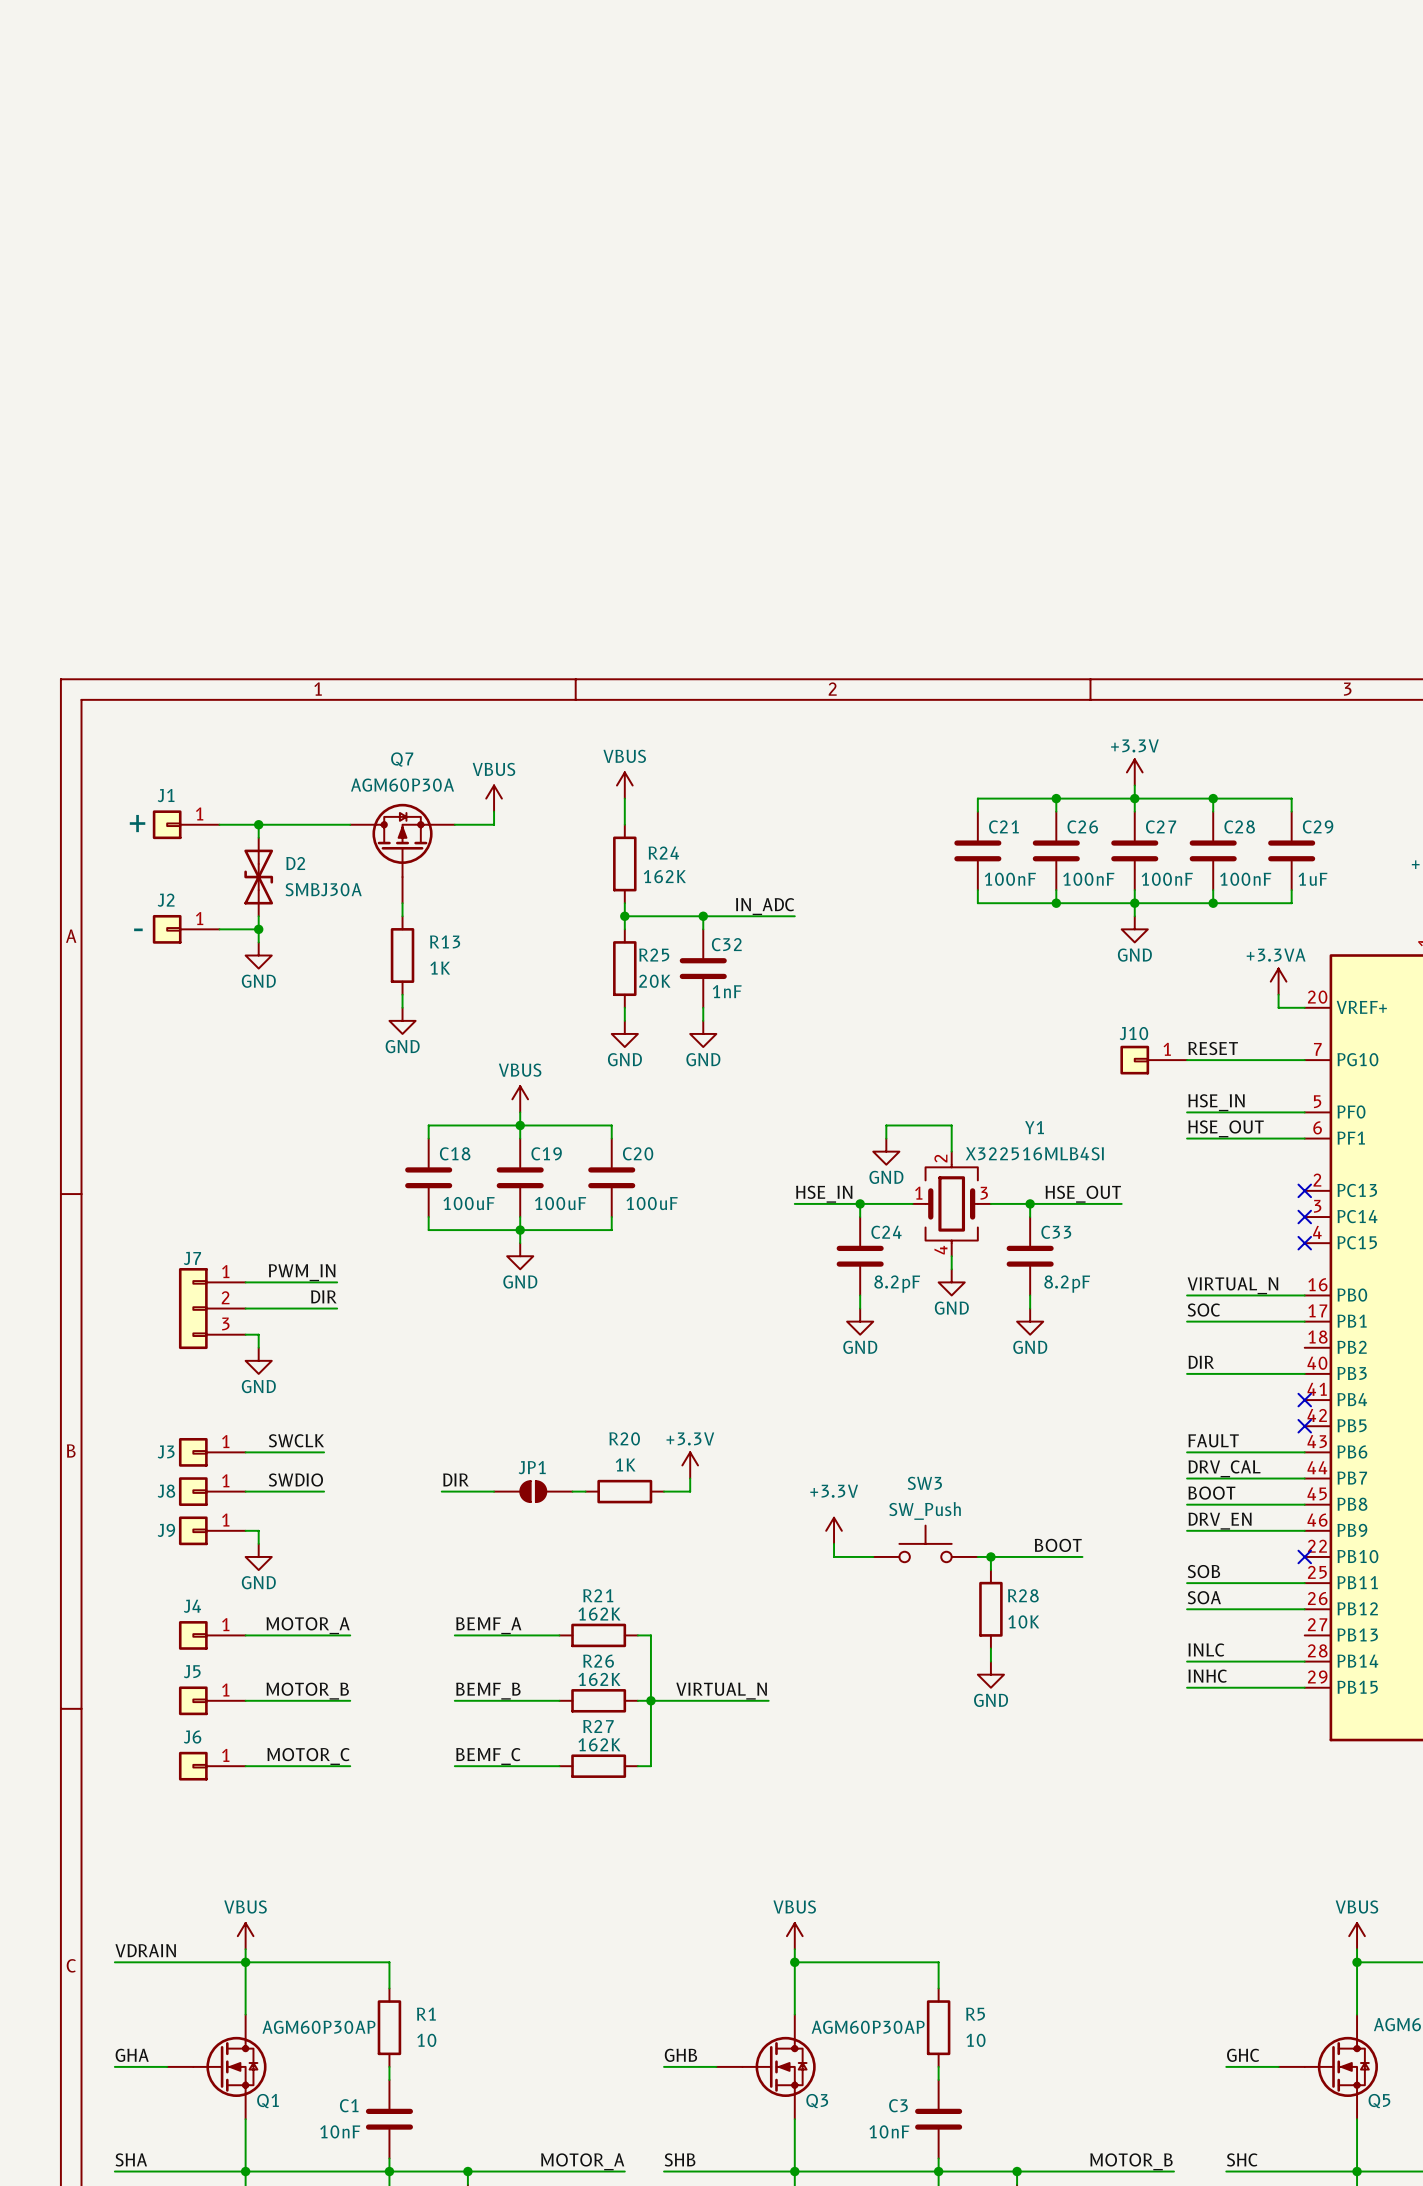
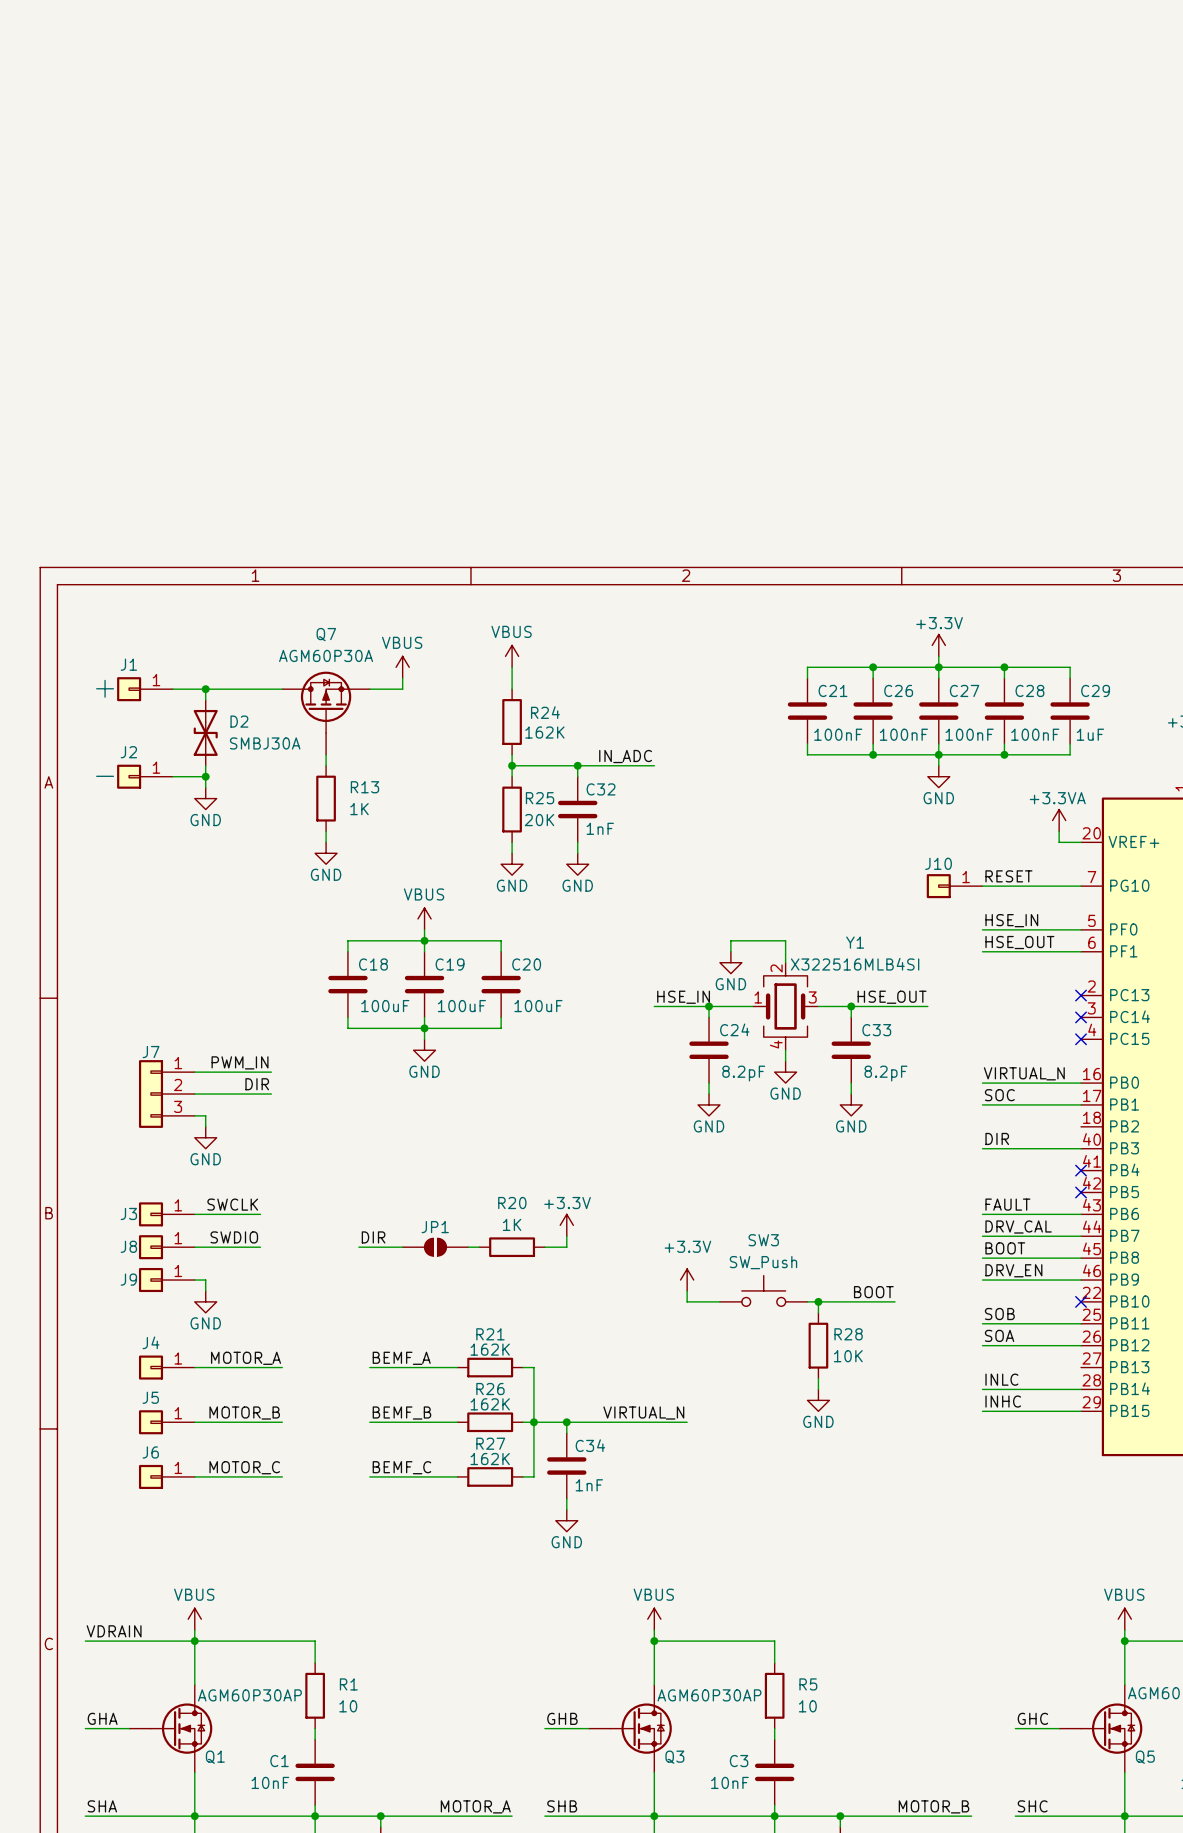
label position: VIRTUAL_N (721, 1691) -> VIRTUAL_N (643, 1413)
wire: none -> (566, 1422) (566, 1433)
junction: none -> (566, 1422)
wire: none -> (632, 1422) (687, 1422)
C34: none -> 1nF (566, 1466)
wire: none -> (566, 1498) (566, 1509)
power symbol: none -> GND (566, 1520)

